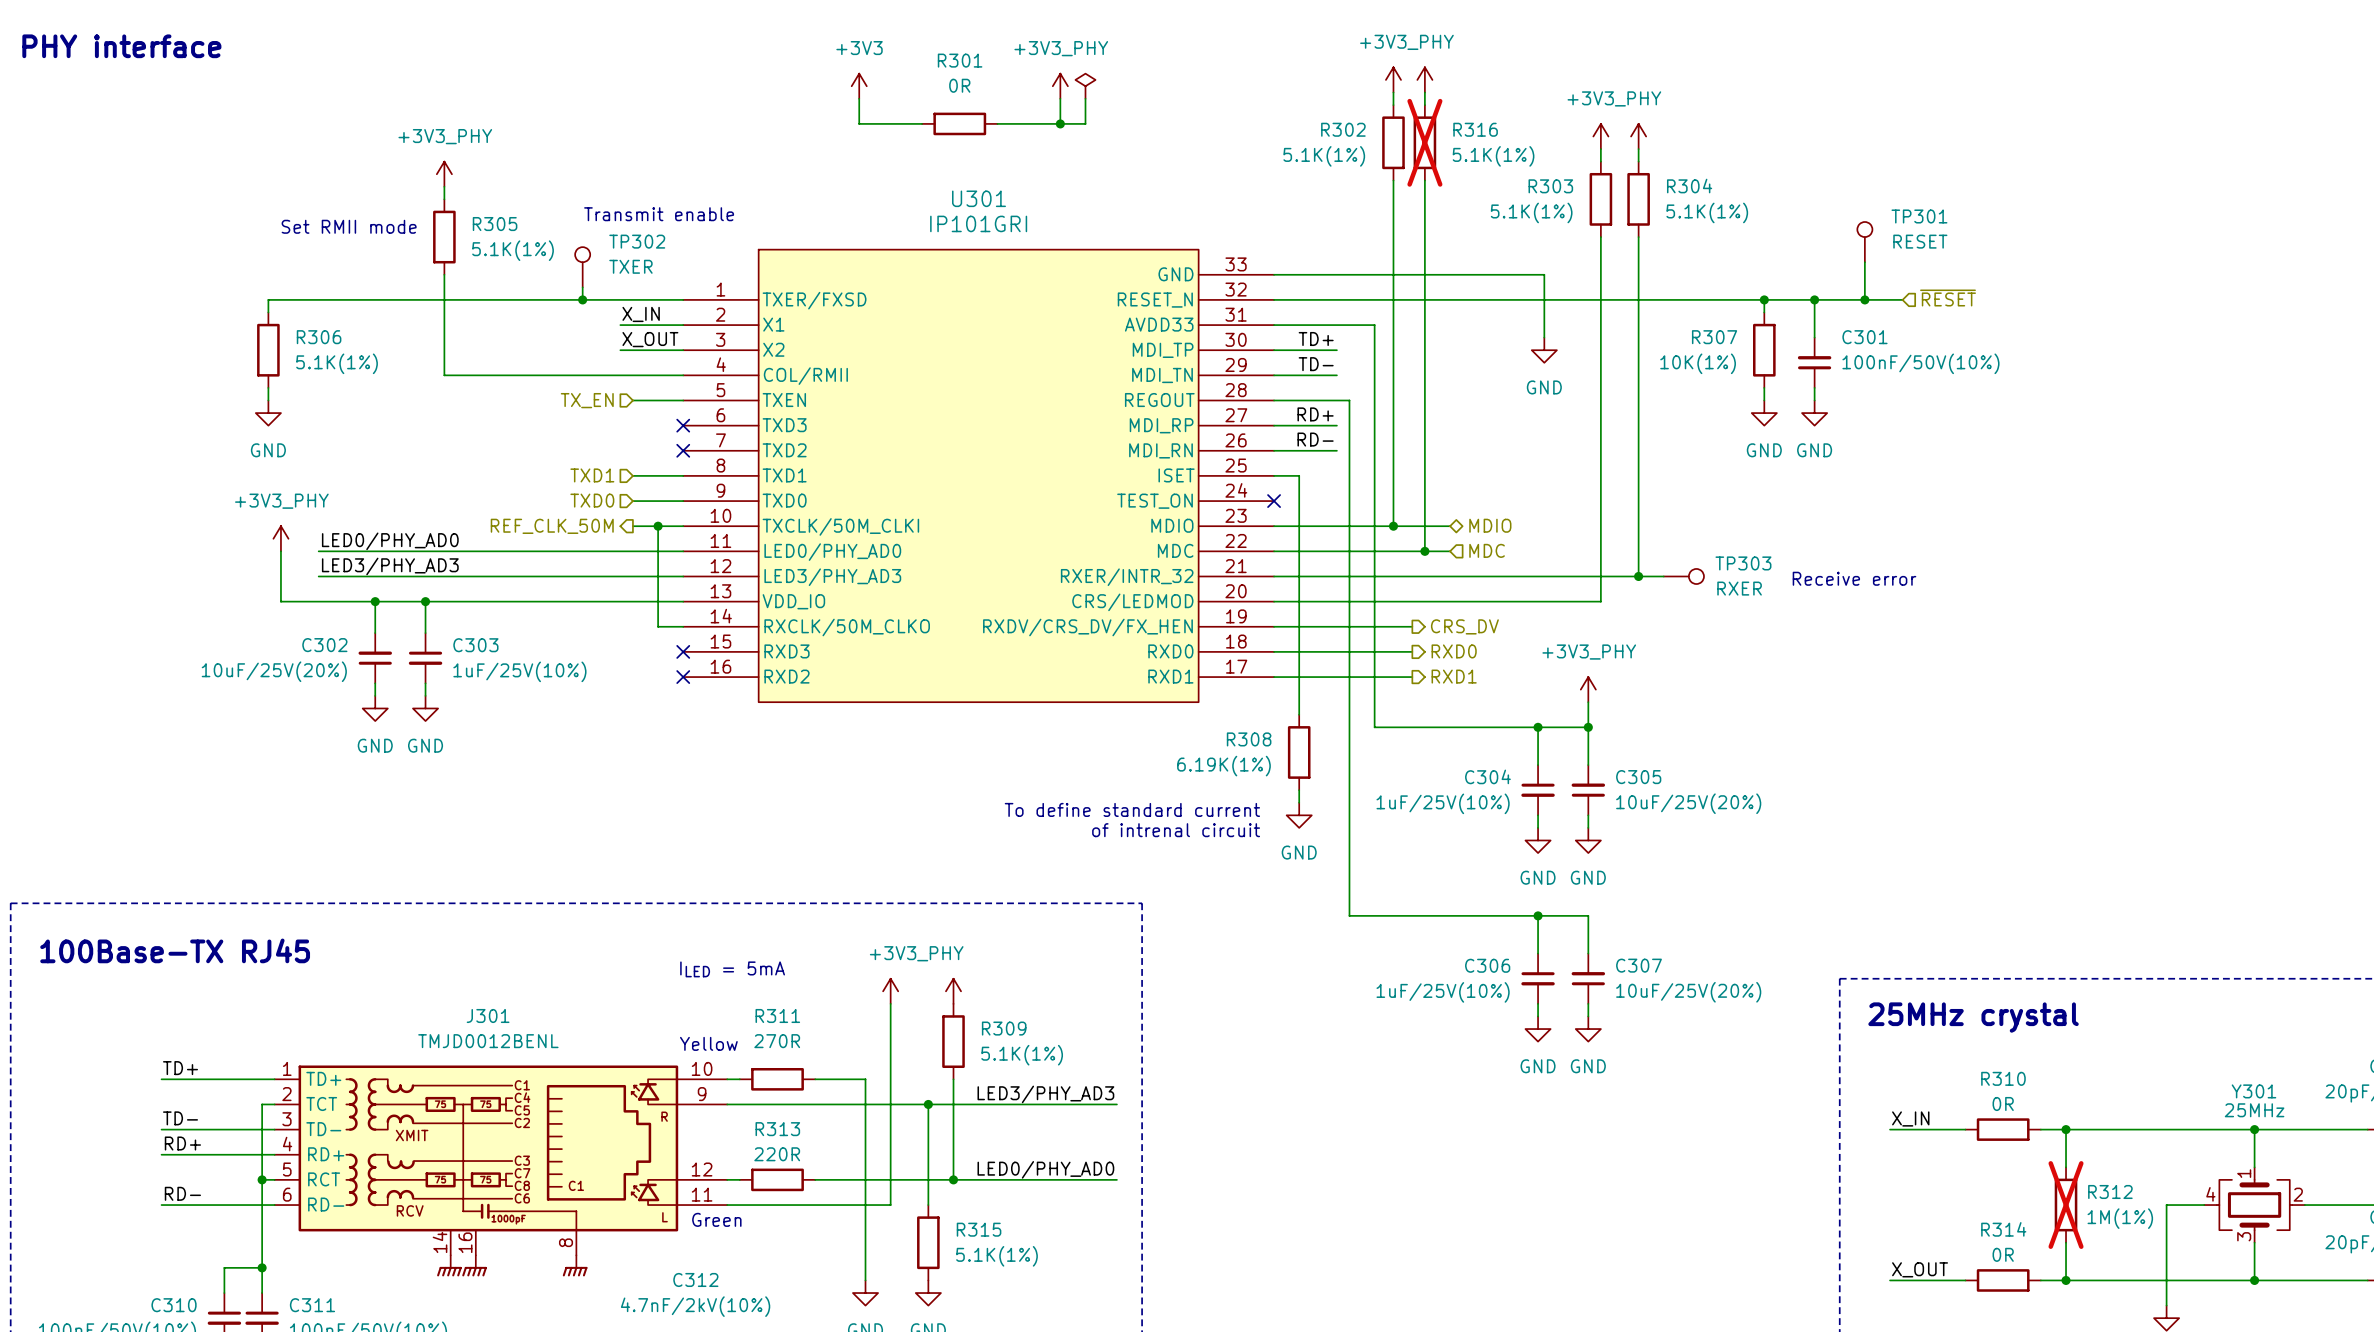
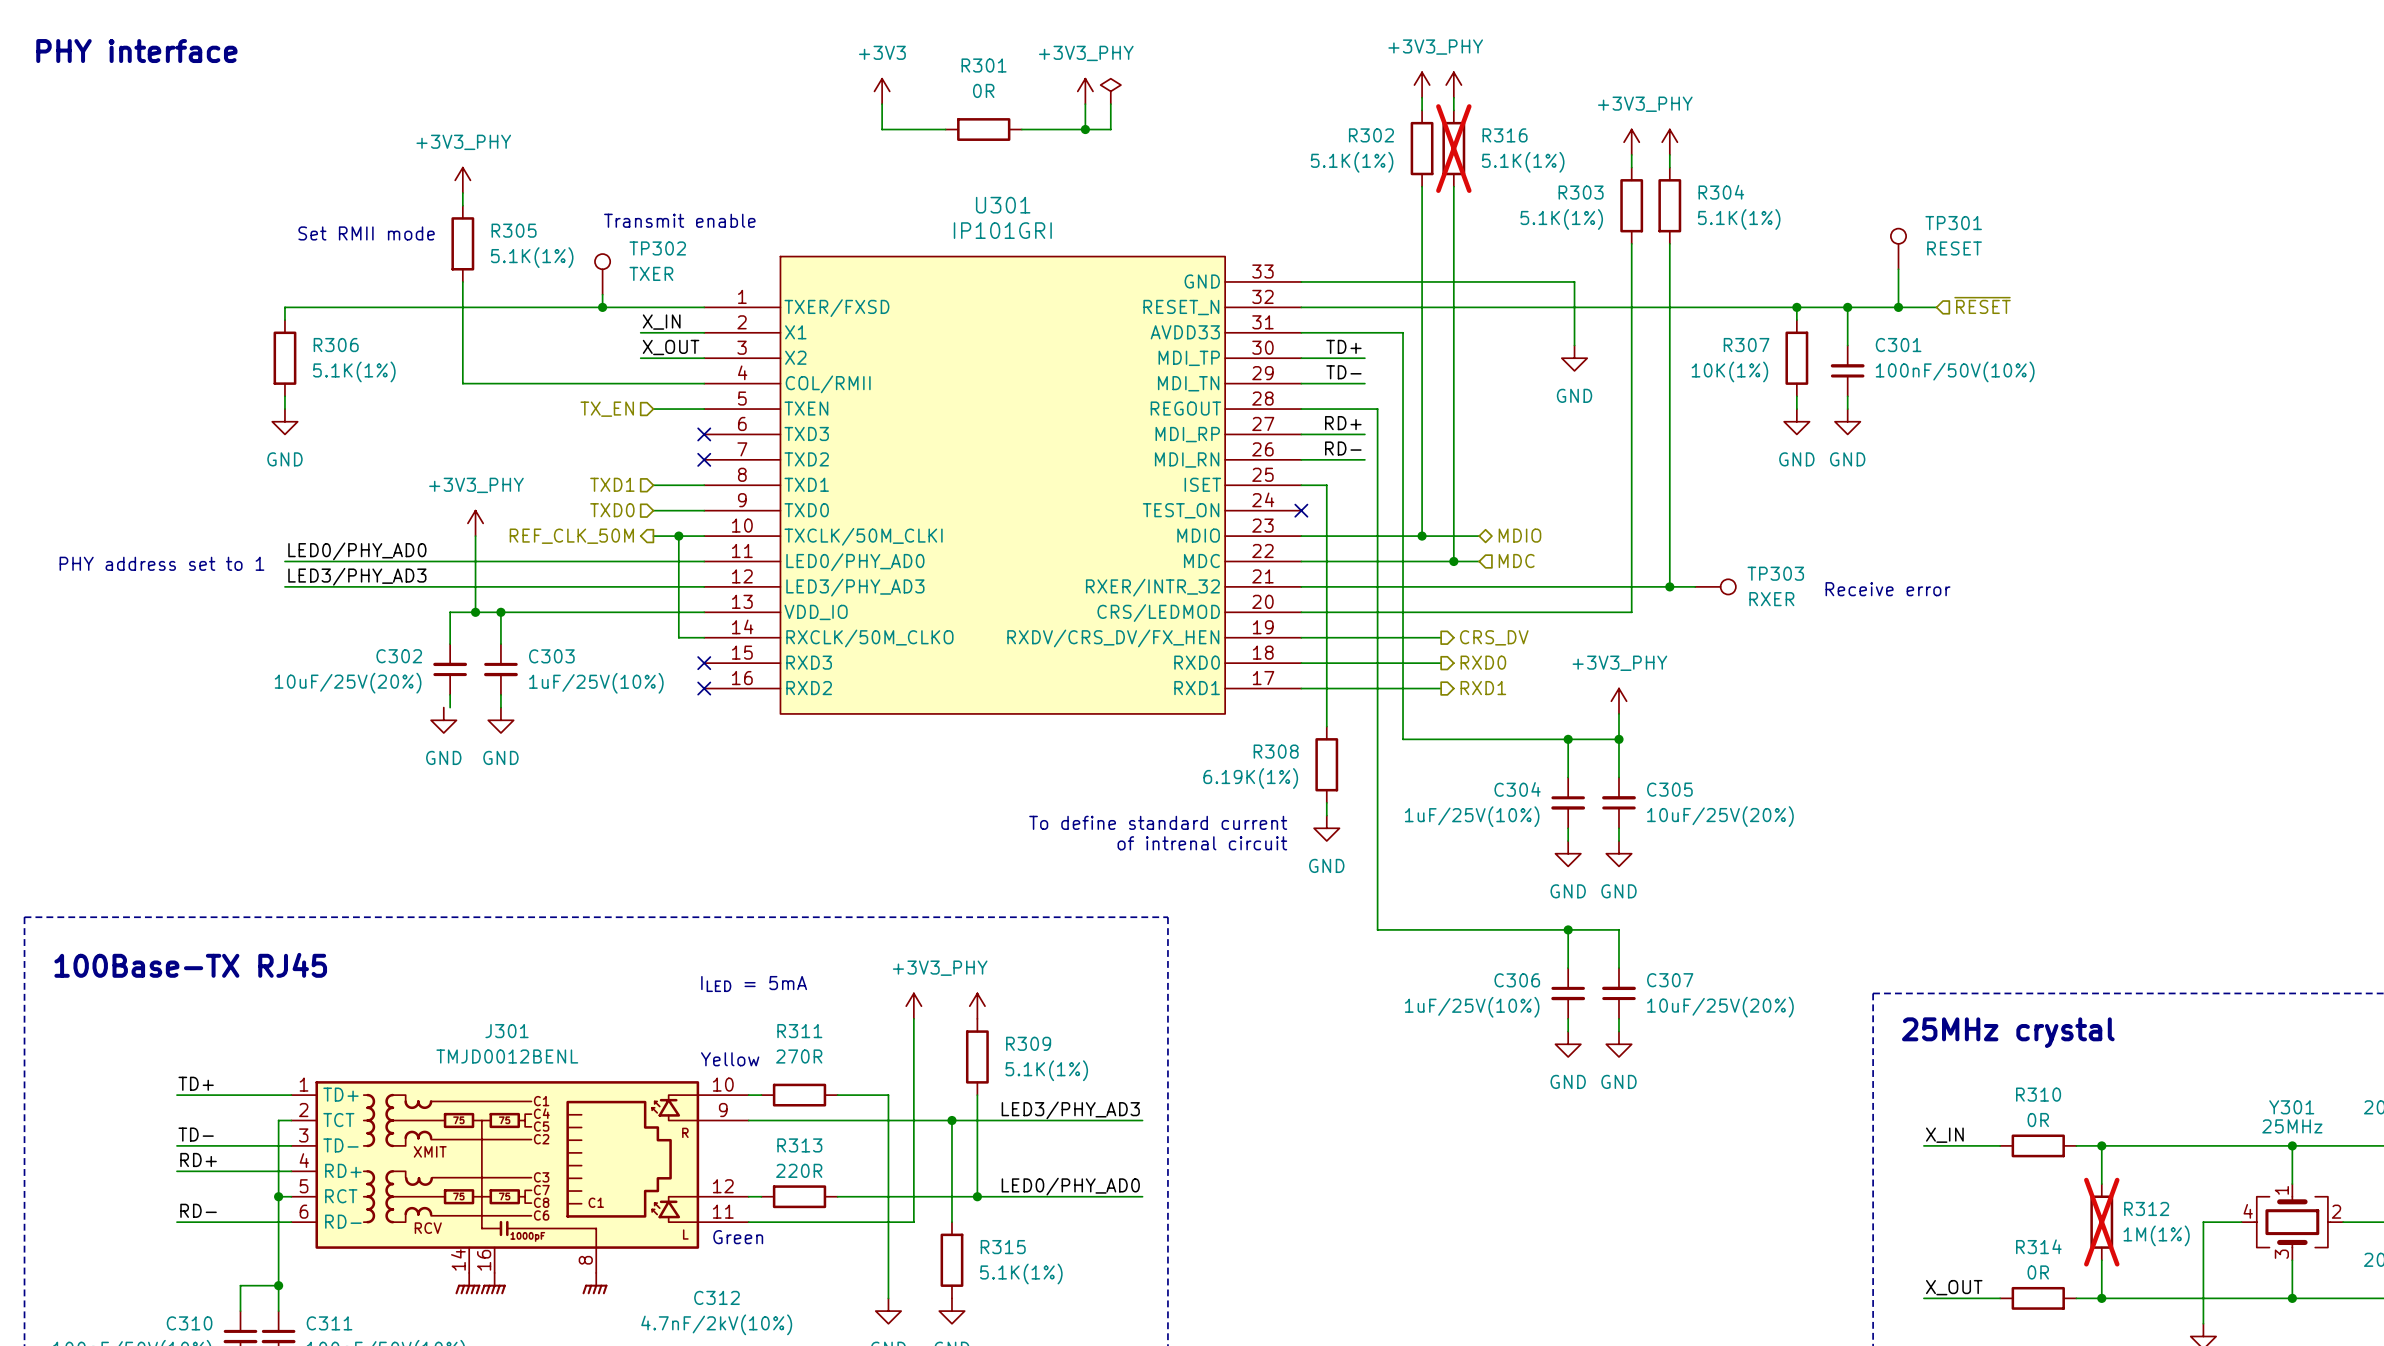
wire: none -> (475, 536) (475, 612)
power symbol position: +3V3_PHY (280, 538) -> +3V3_PHY (475, 523)
label position: LED0/PHY_AD0 (390, 541) -> LED0/PHY_AD0 (357, 551)
wire: none -> (284, 561) (335, 561)
wire: (280, 551) (280, 601) (431, 601) -> (450, 644) (450, 612)
text: none -> PHY address set to 1 (161, 563)
label position: LED3/PHY_AD3 (390, 566) -> LED3/PHY_AD3 (357, 576)
wire: none -> (284, 586) (335, 586)
wire: (375, 601) (375, 633) -> none
junction: (375, 601) -> none
wire: (425, 601) (425, 633) -> (500, 612) (500, 644)
junction: (425, 601) -> none
junction: none -> (475, 612)
junction: none -> (500, 612)
C302 position: (375, 658) -> (450, 669)
C303 position: (425, 658) -> (500, 669)
wire: (375, 683) (375, 695) -> (450, 694) (450, 707)
wire: (425, 683) (425, 695) -> (500, 694) (500, 707)
power symbol position: GND (375, 708) -> GND (500, 720)

